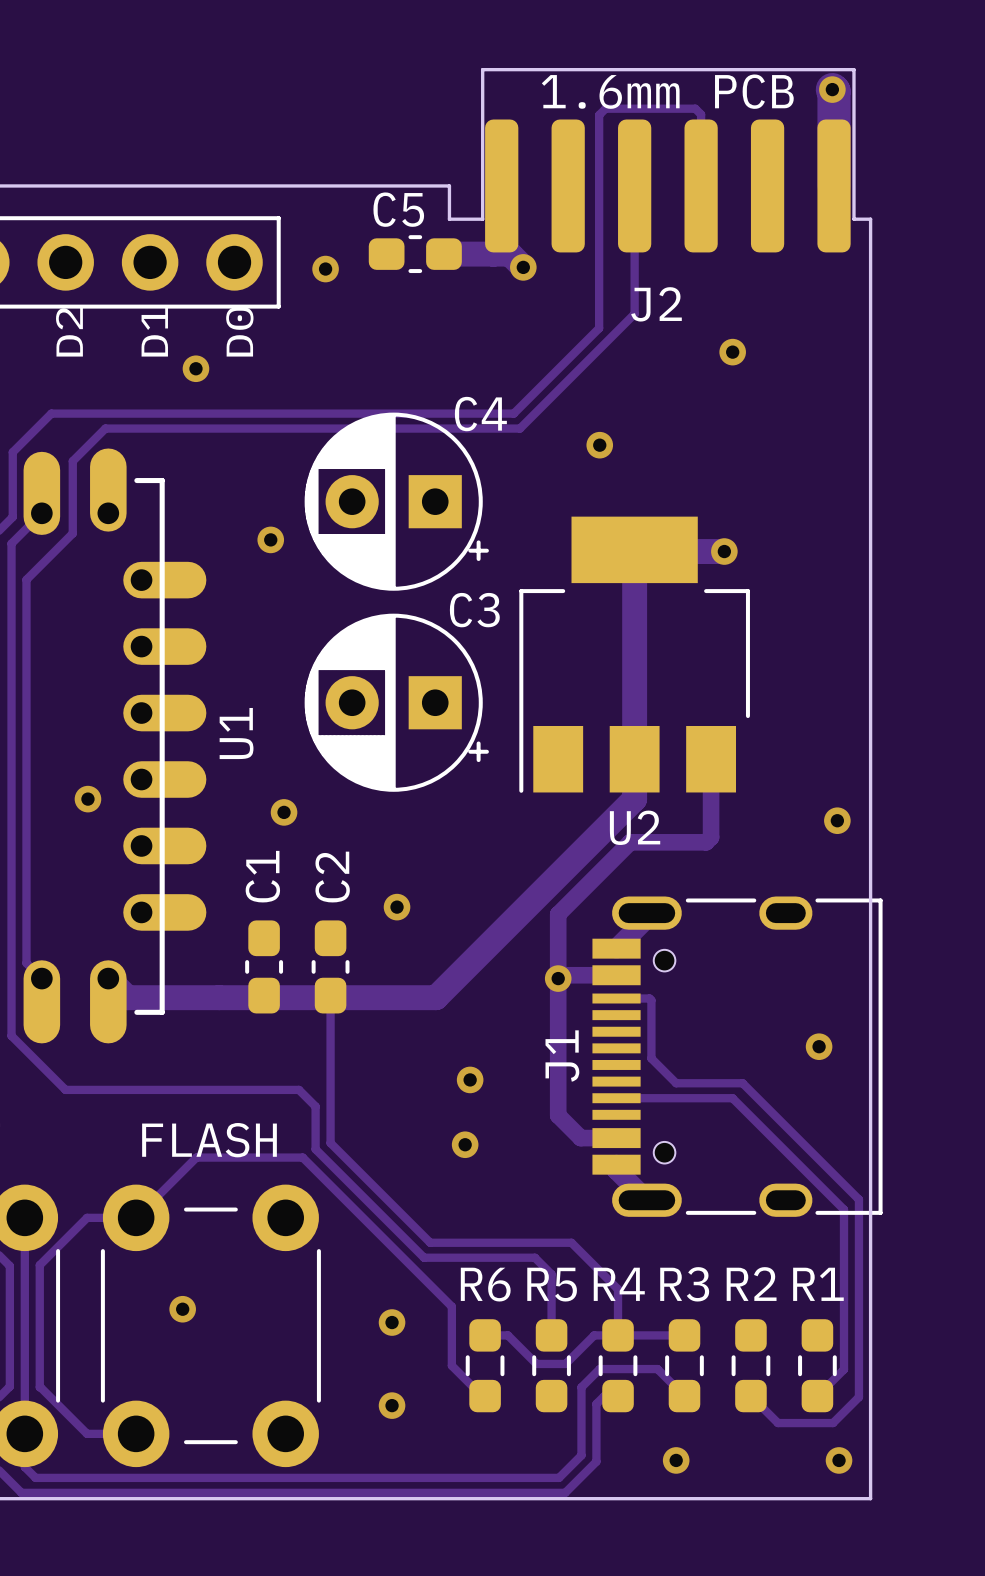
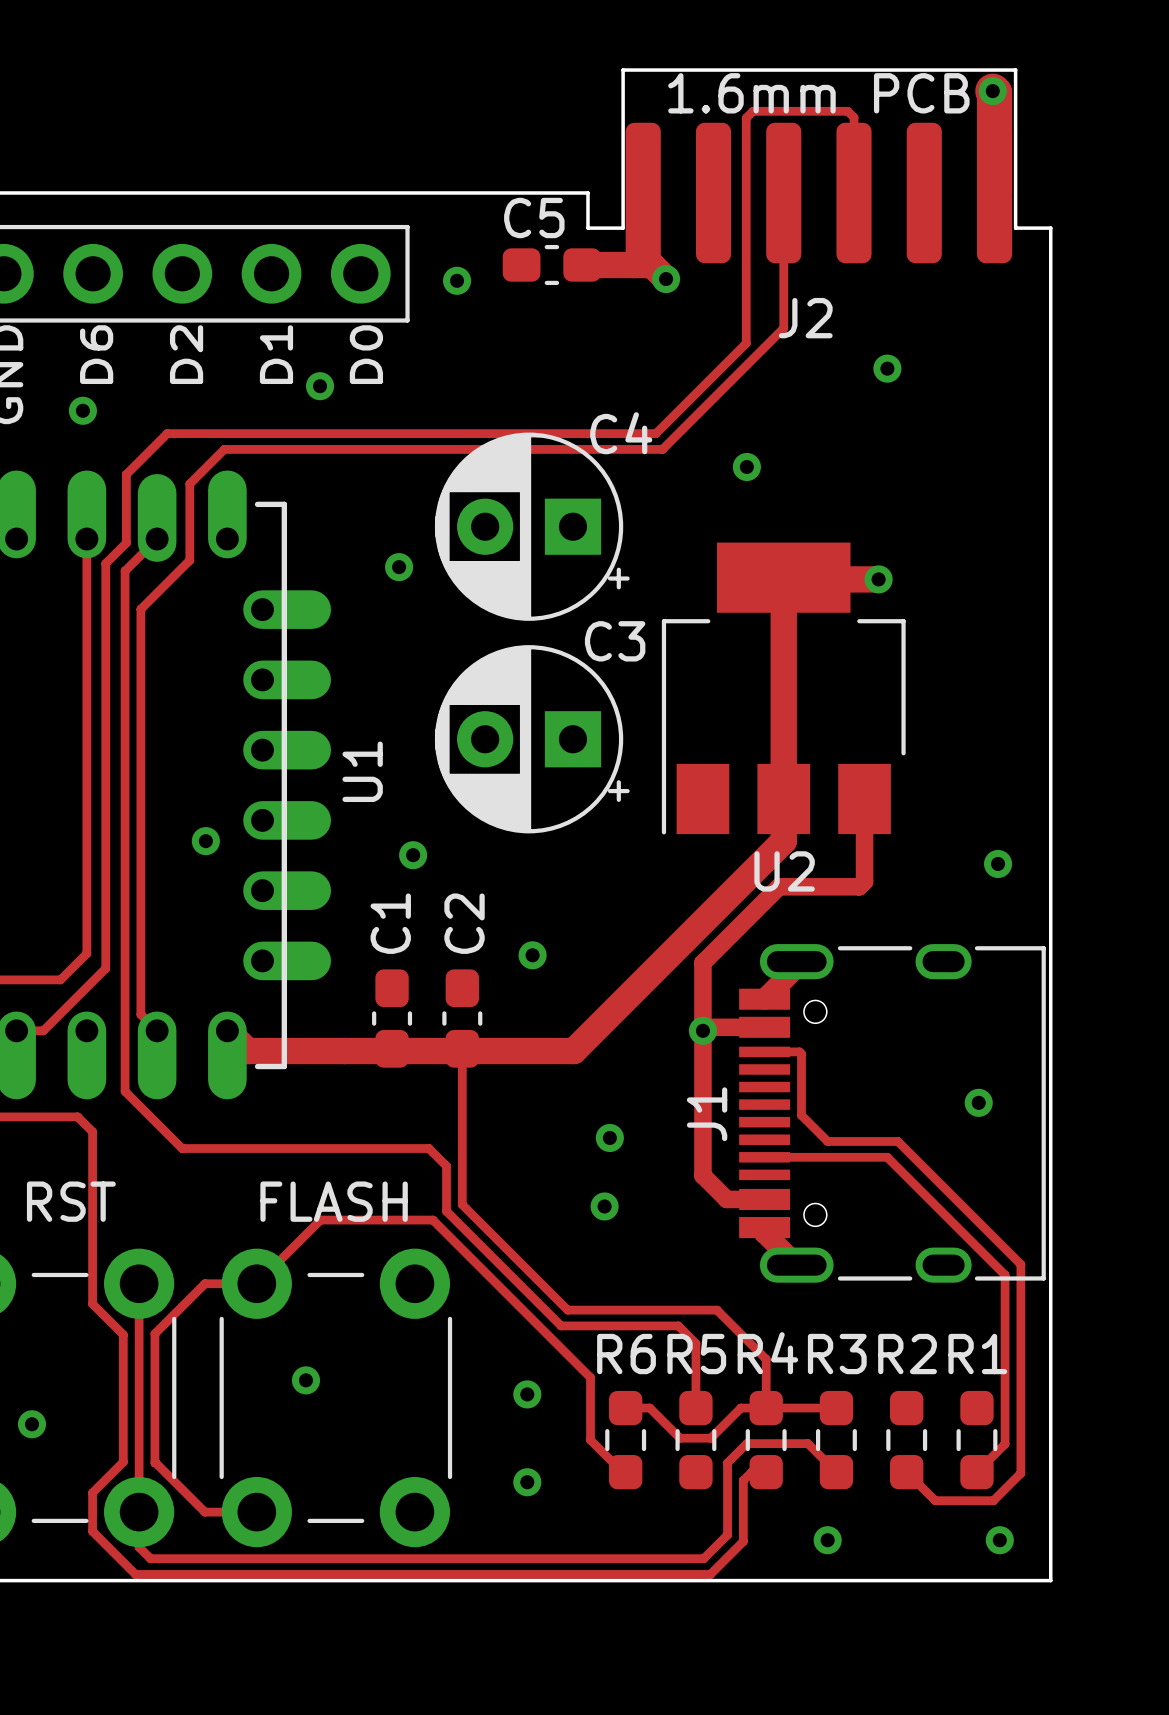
board edge: (870, 219) (870, 1498) -> (1033, 228) (1050, 228) (1050, 1580) (1033, 1580)

